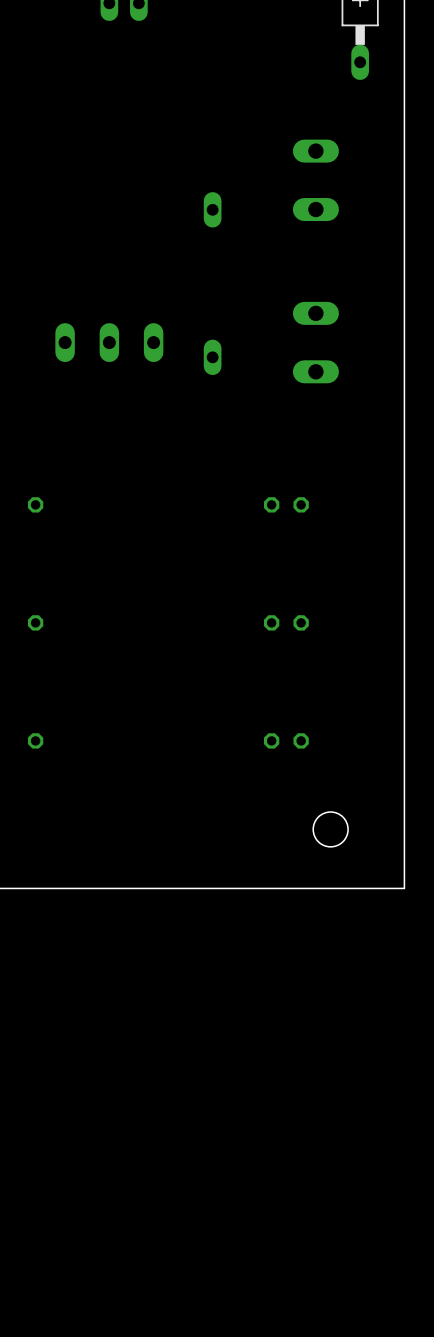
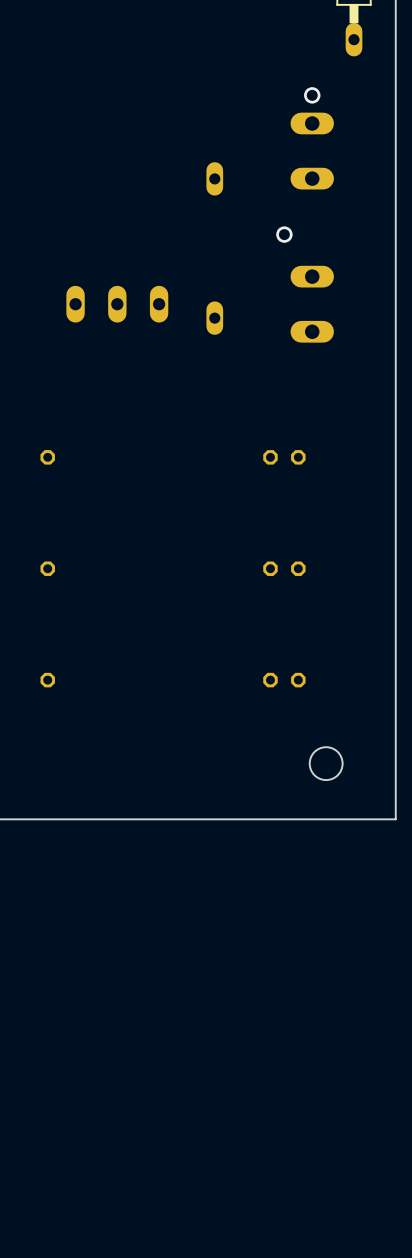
via: none -> (312, 95)
via: none -> (284, 234)

